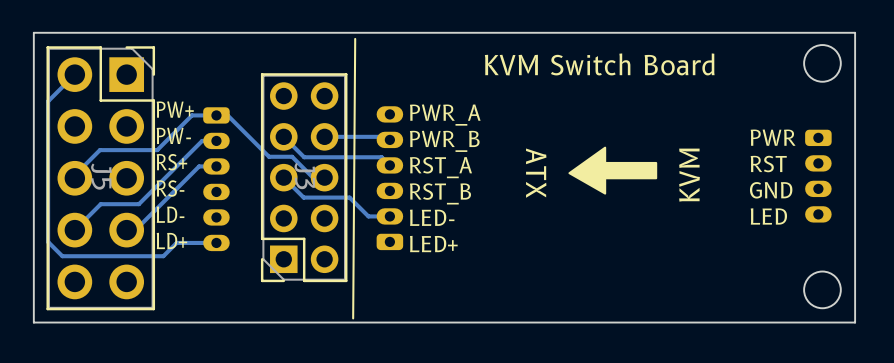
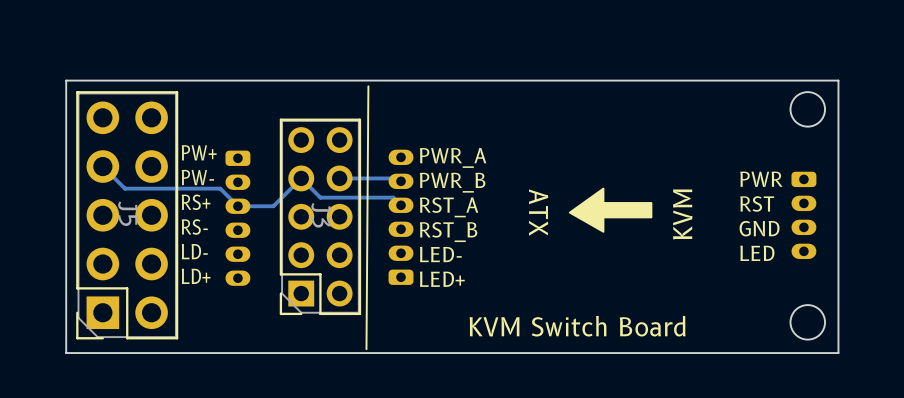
text position: KVM Switch Board (599, 64) -> KVM Switch Board (577, 326)
track: (74, 74) (48, 101) (48, 241) (62, 256) (163, 256) (176, 242) (216, 242) -> none
track: none -> (102, 166) (124, 188) (220, 188) (237, 206) (273, 206) (301, 178)
track: (216, 140) (202, 140) (138, 204) (100, 204) (74, 230) (74, 233) -> none
track: (216, 166) (199, 166) (135, 230) (126, 230) -> none
track: (283, 177) (303, 197) (349, 197) (368, 216) (389, 216) -> none
track: (324, 177) (313, 177) (292, 156) (269, 156) (227, 115) (191, 115) (157, 150) (99, 150) (74, 175) (74, 178) -> none
J5 rotation: 0° (100, 178) -> 180° (127, 215)

